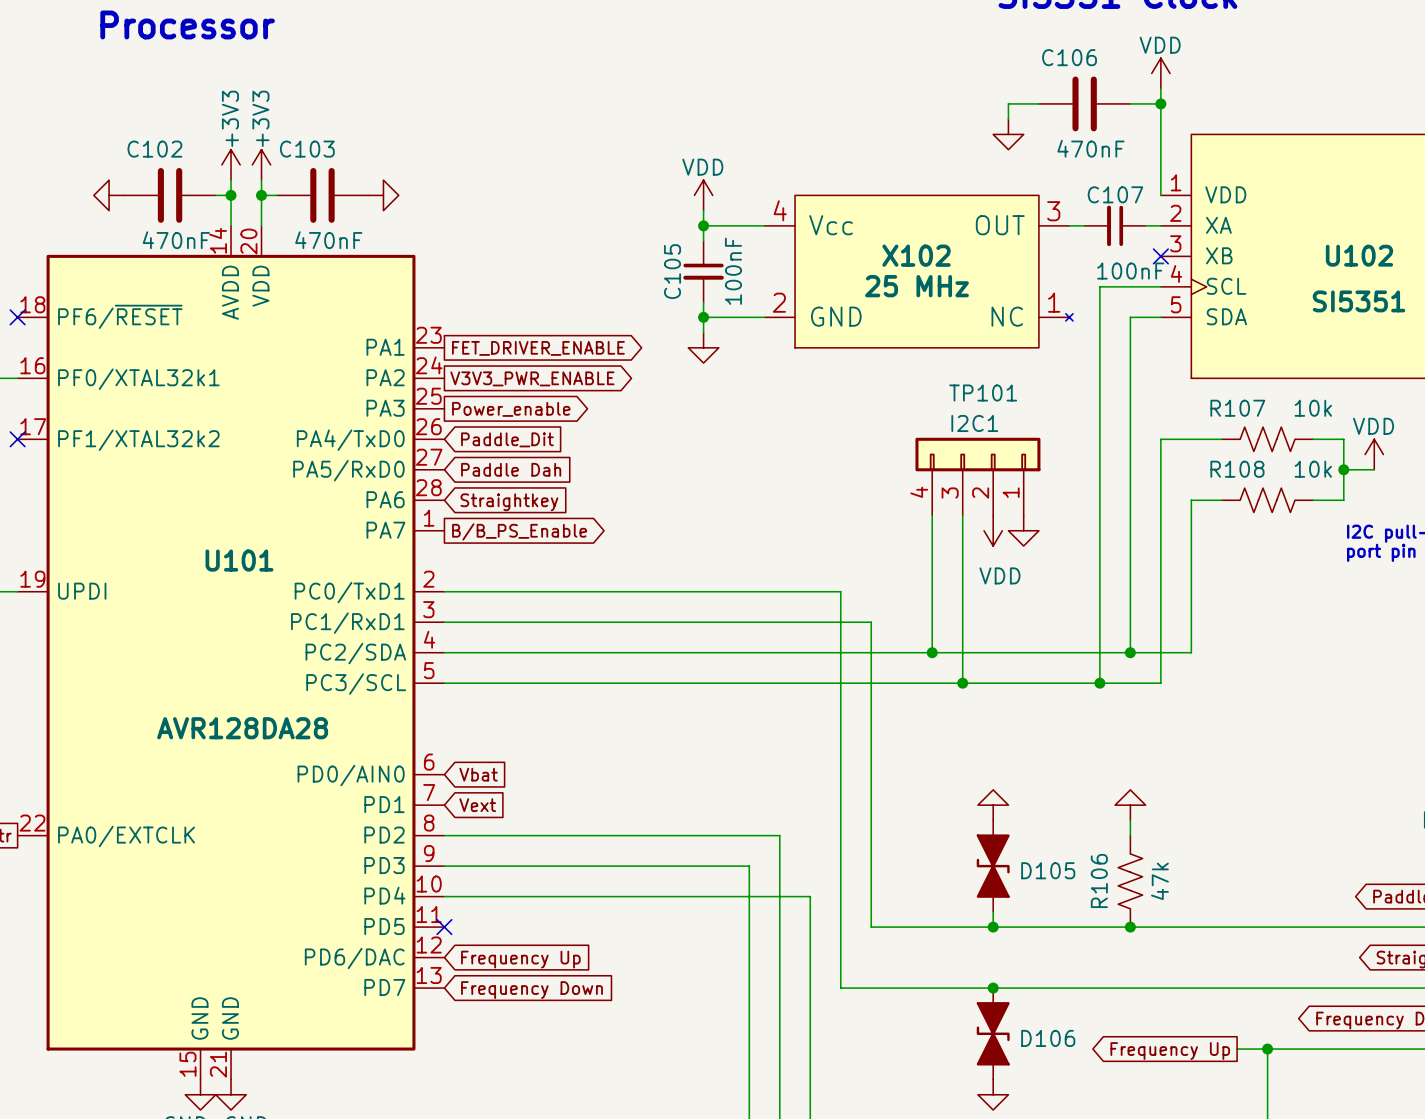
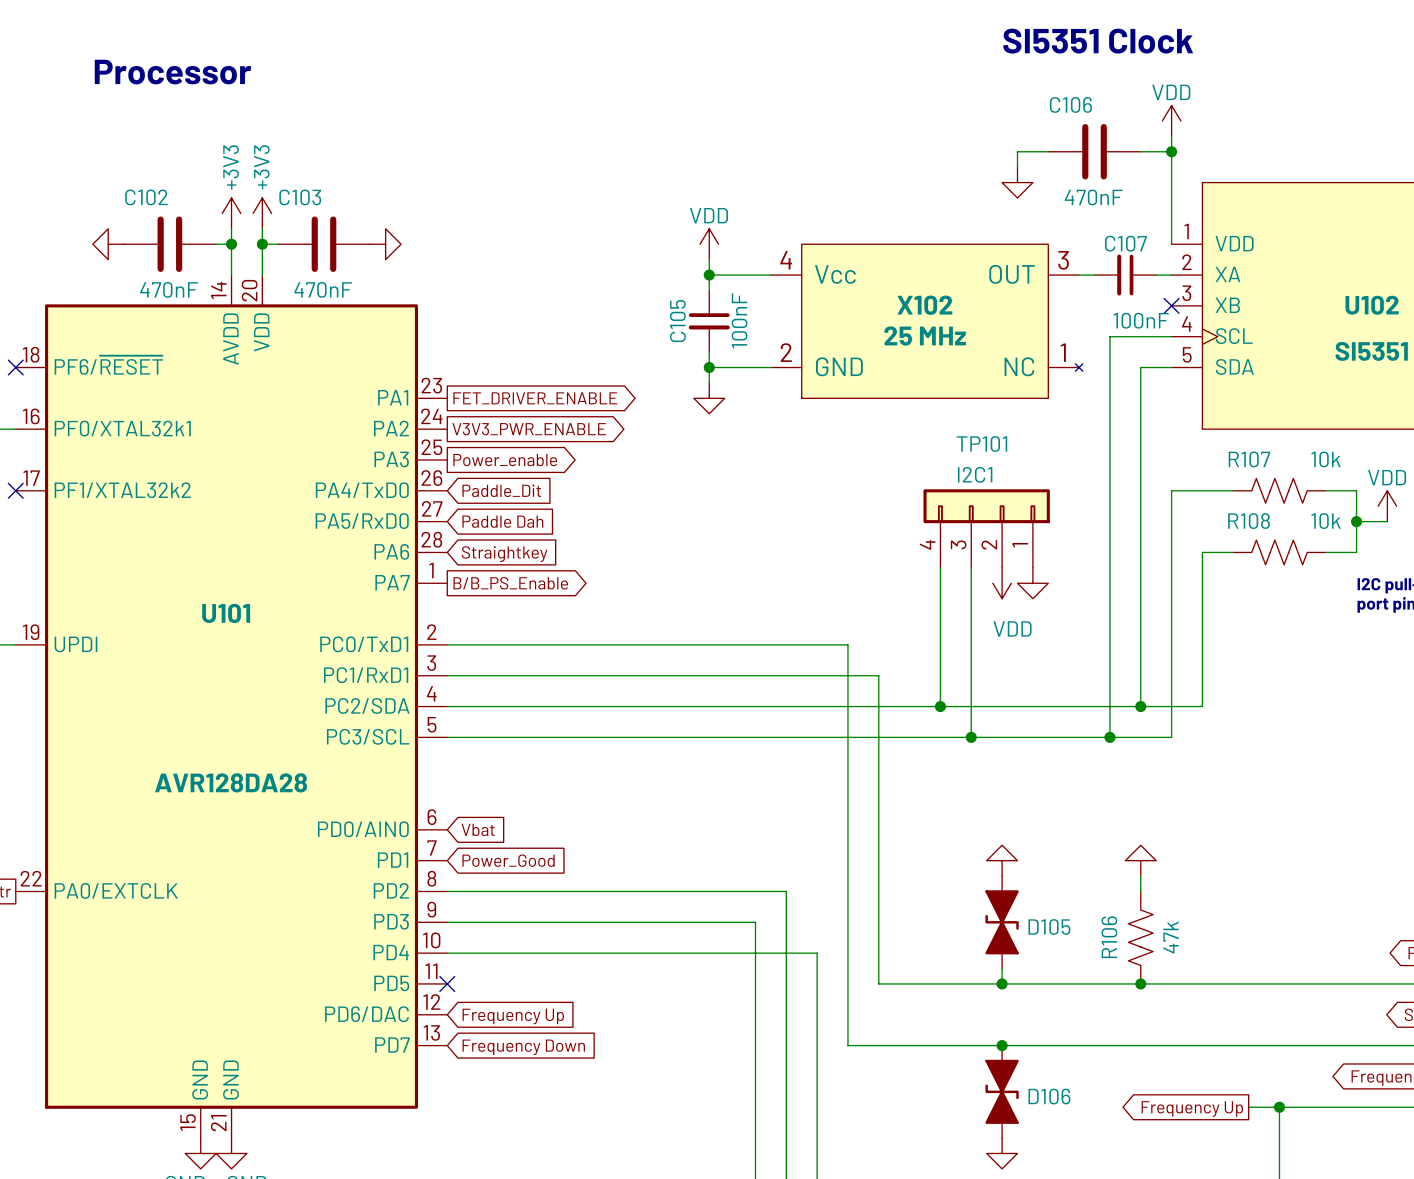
global label: Vext (477, 805) -> Power_Good (508, 860)

